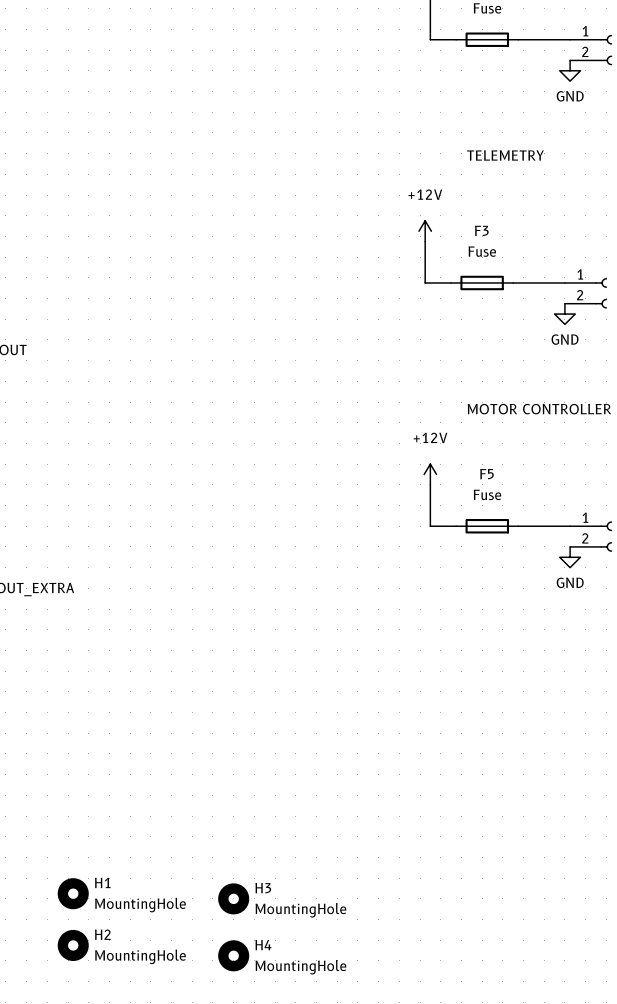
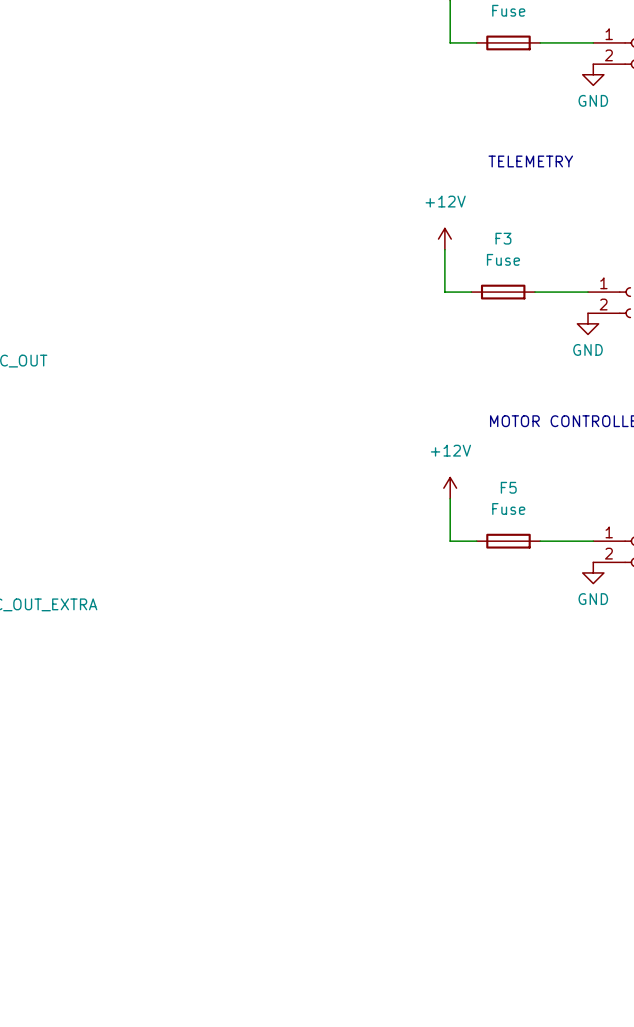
H1: MountingHole (73, 893) -> none
H3: MountingHole (233, 898) -> none
H2: MountingHole (73, 945) -> none
H4: MountingHole (233, 955) -> none

